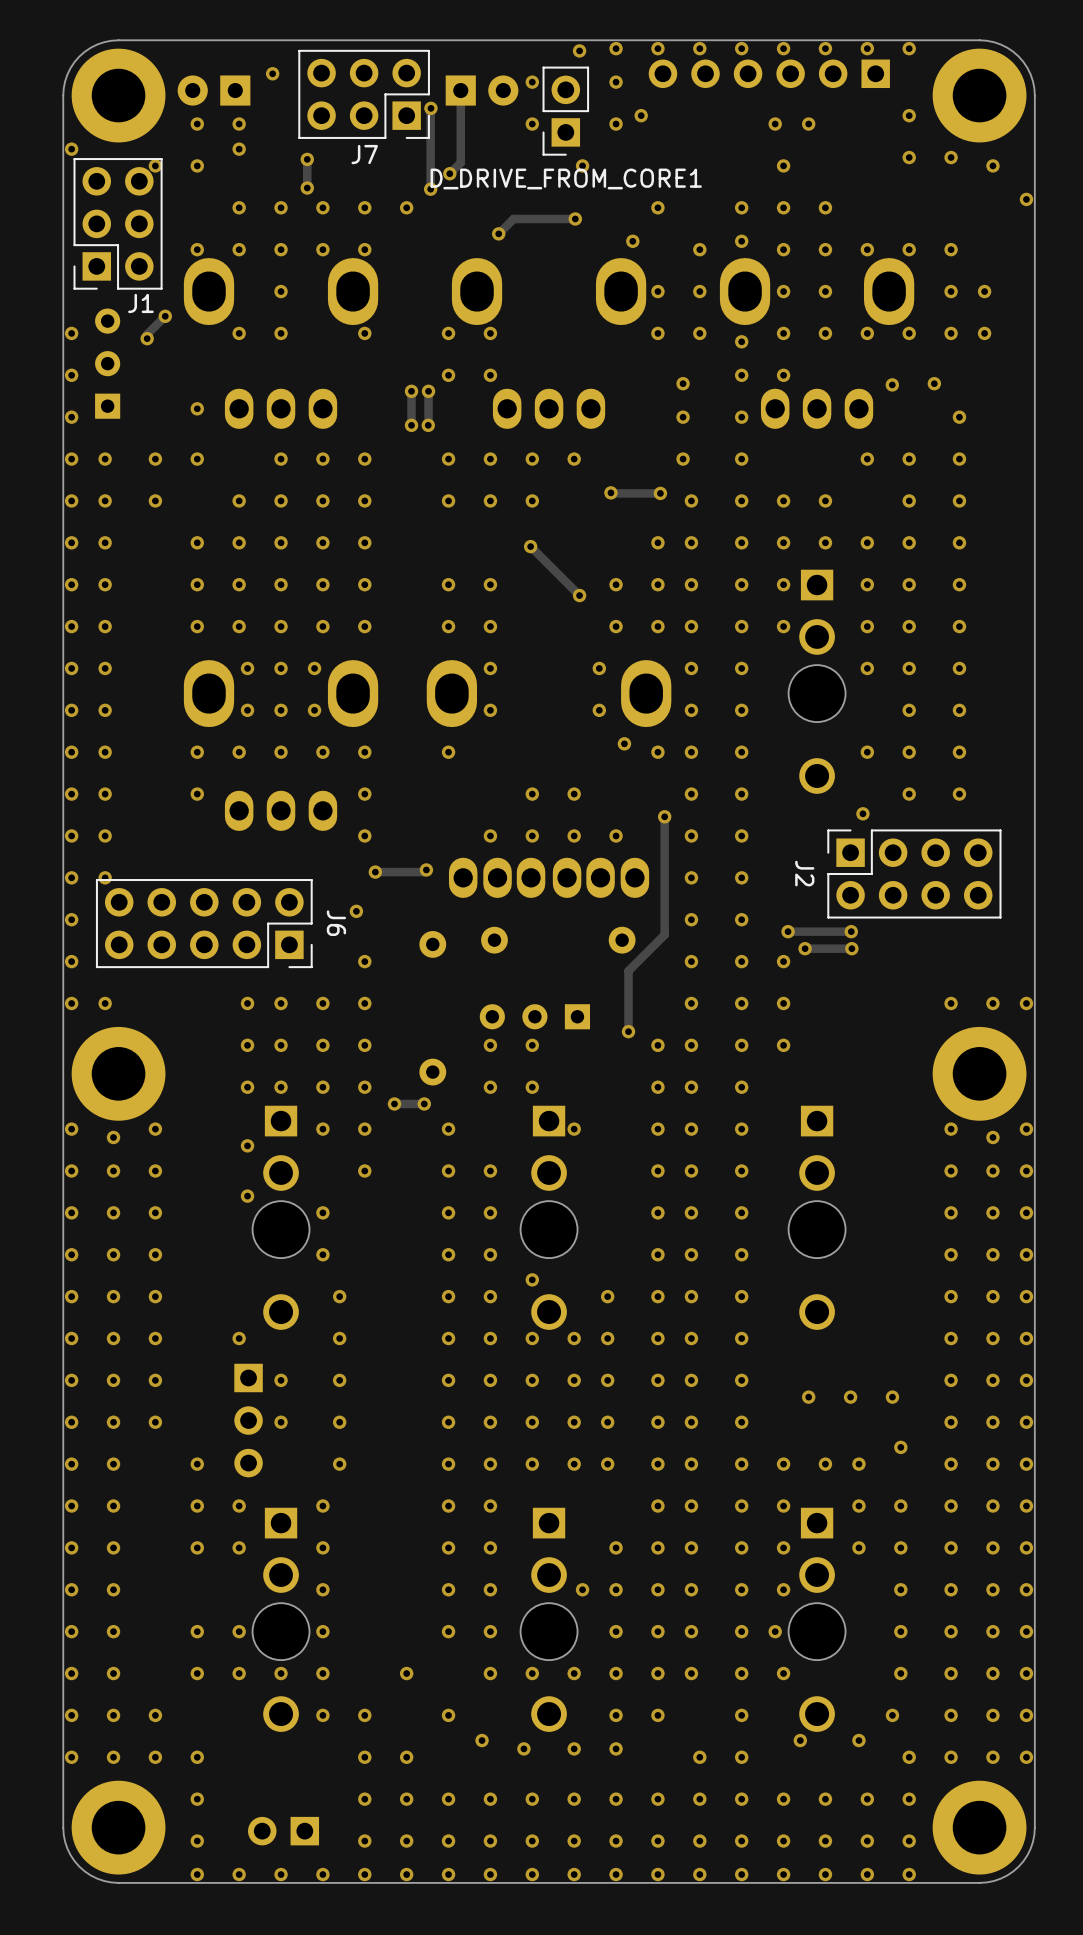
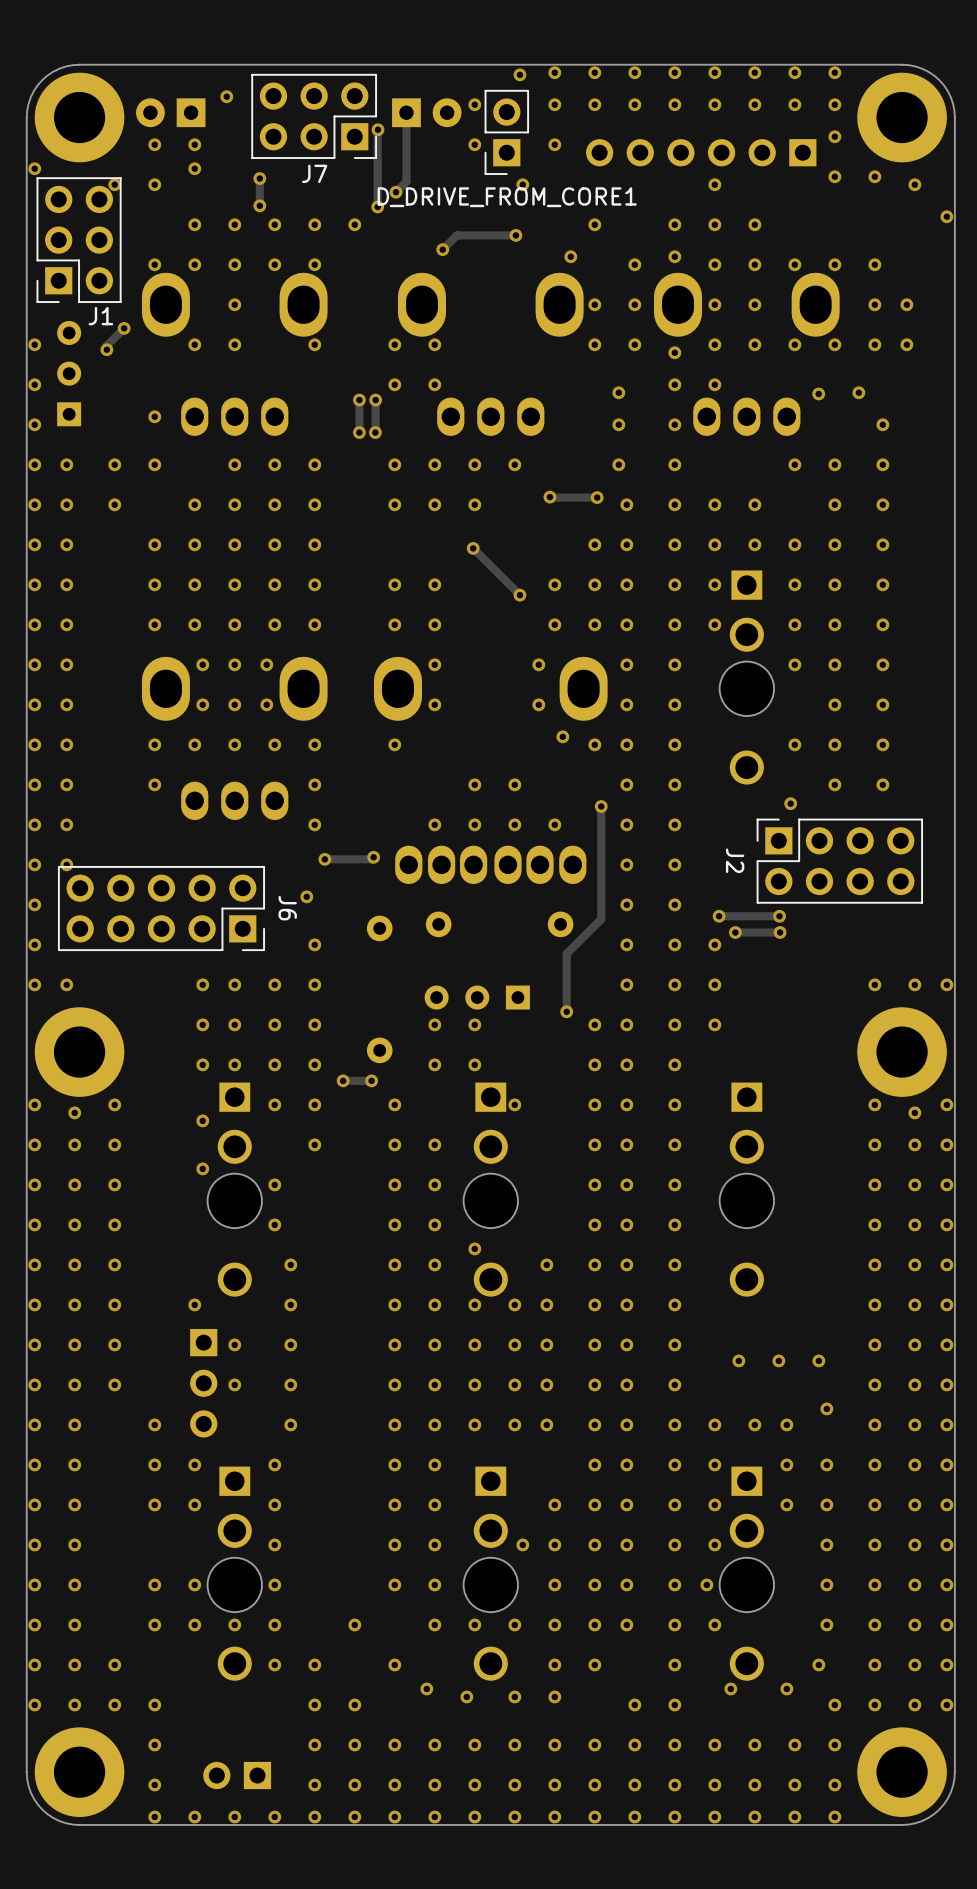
part position: (769, 73) -> (701, 152)
via: none -> (594, 104)
via: none -> (634, 104)
via: none -> (674, 104)
via: none -> (714, 104)
via: none -> (754, 104)
via: none -> (794, 104)
via: none -> (834, 104)
via: (641, 115) -> none
via: (775, 124) -> none
via: (808, 124) -> none

